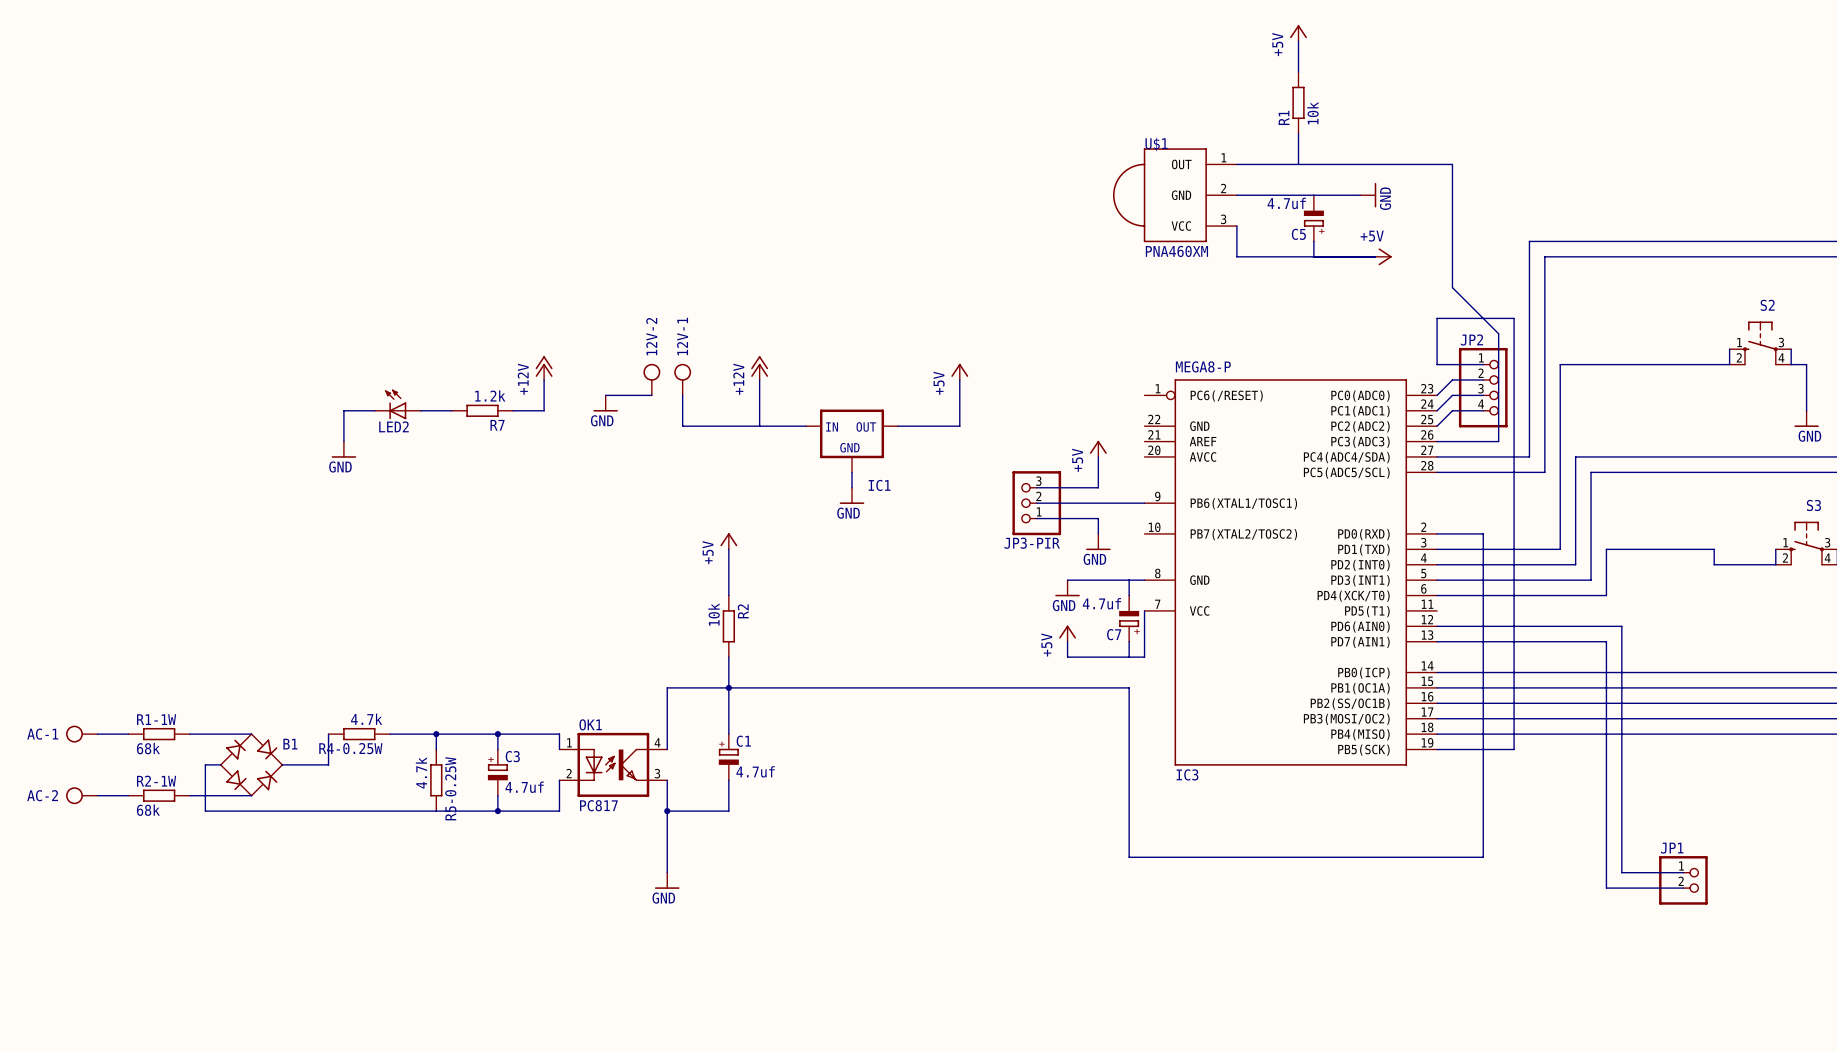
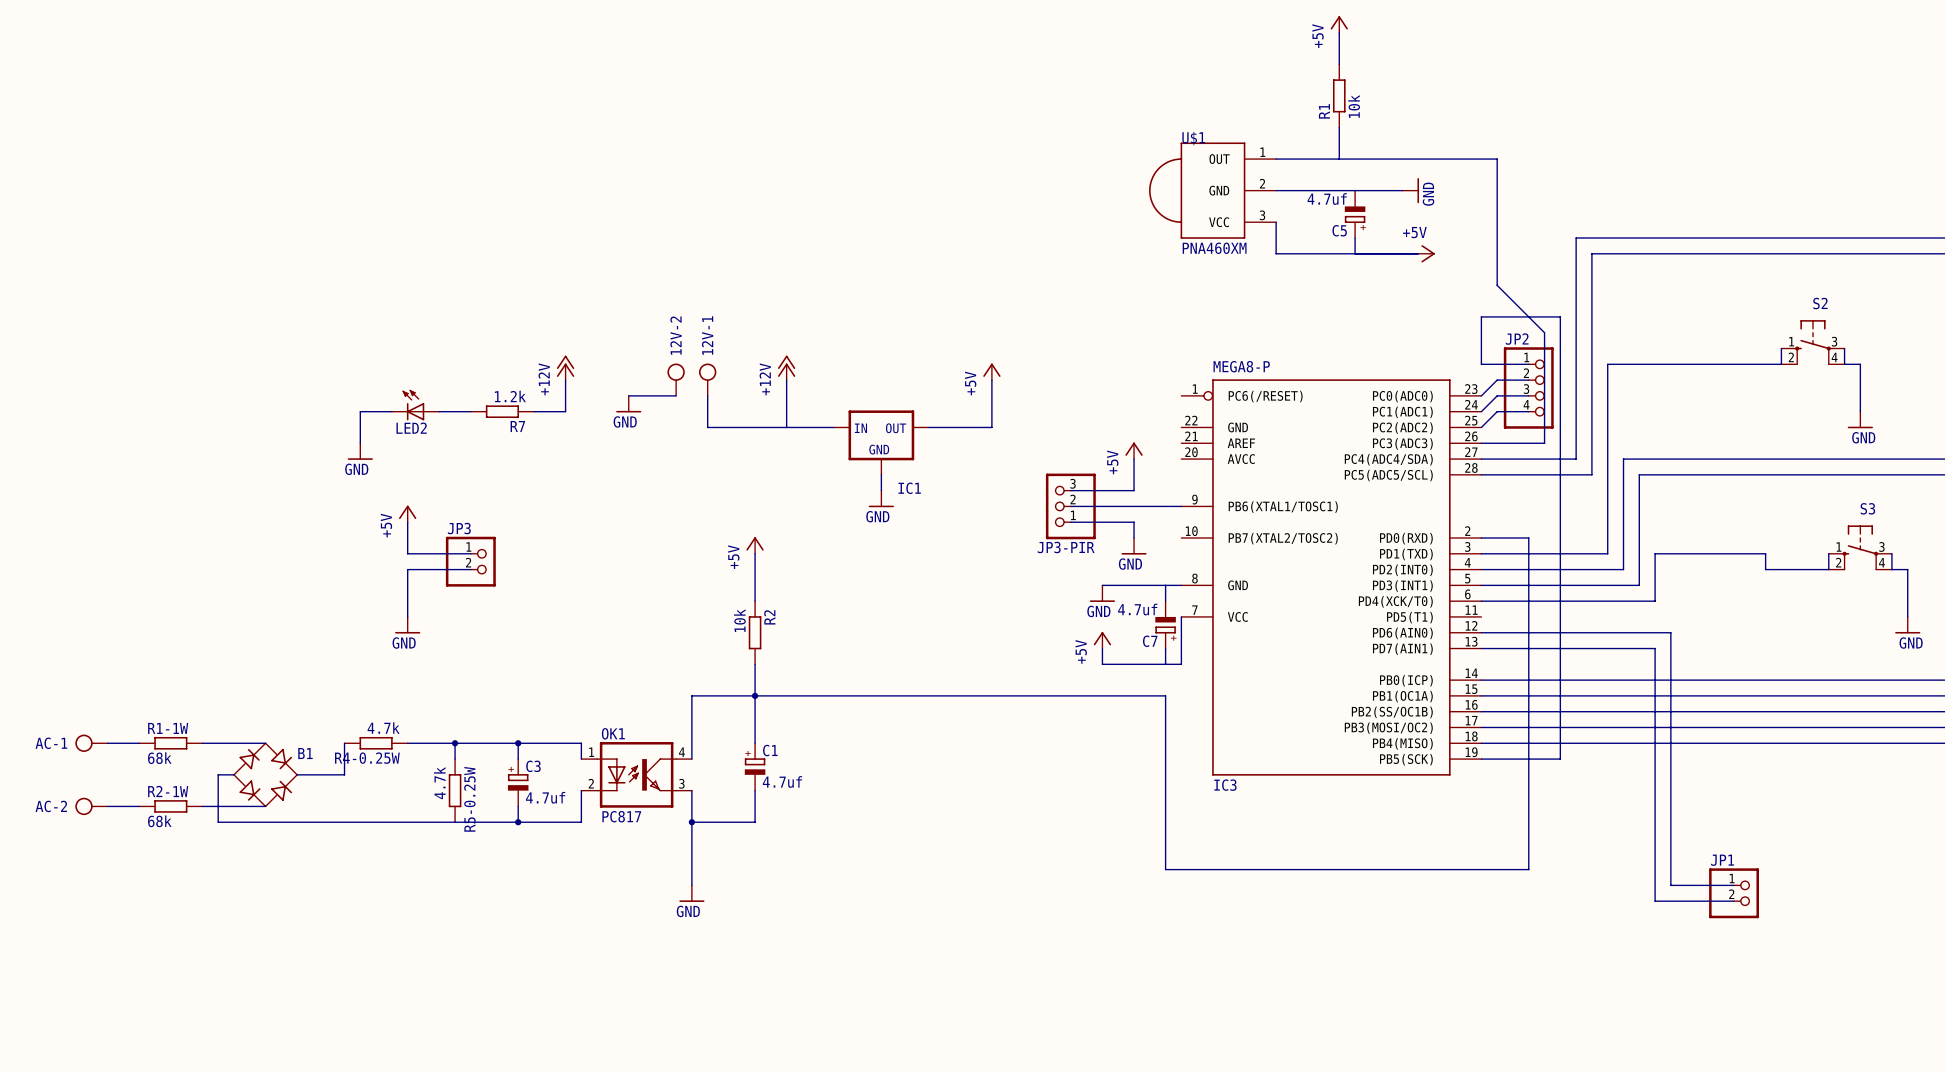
power symbol: none -> +5V (407, 513)
wire: none -> (407, 522) (407, 553) (470, 553)
JP3: none -> (470, 561)
wire: none -> (470, 569) (407, 569) (407, 616)
power symbol: none -> GND (407, 625)

